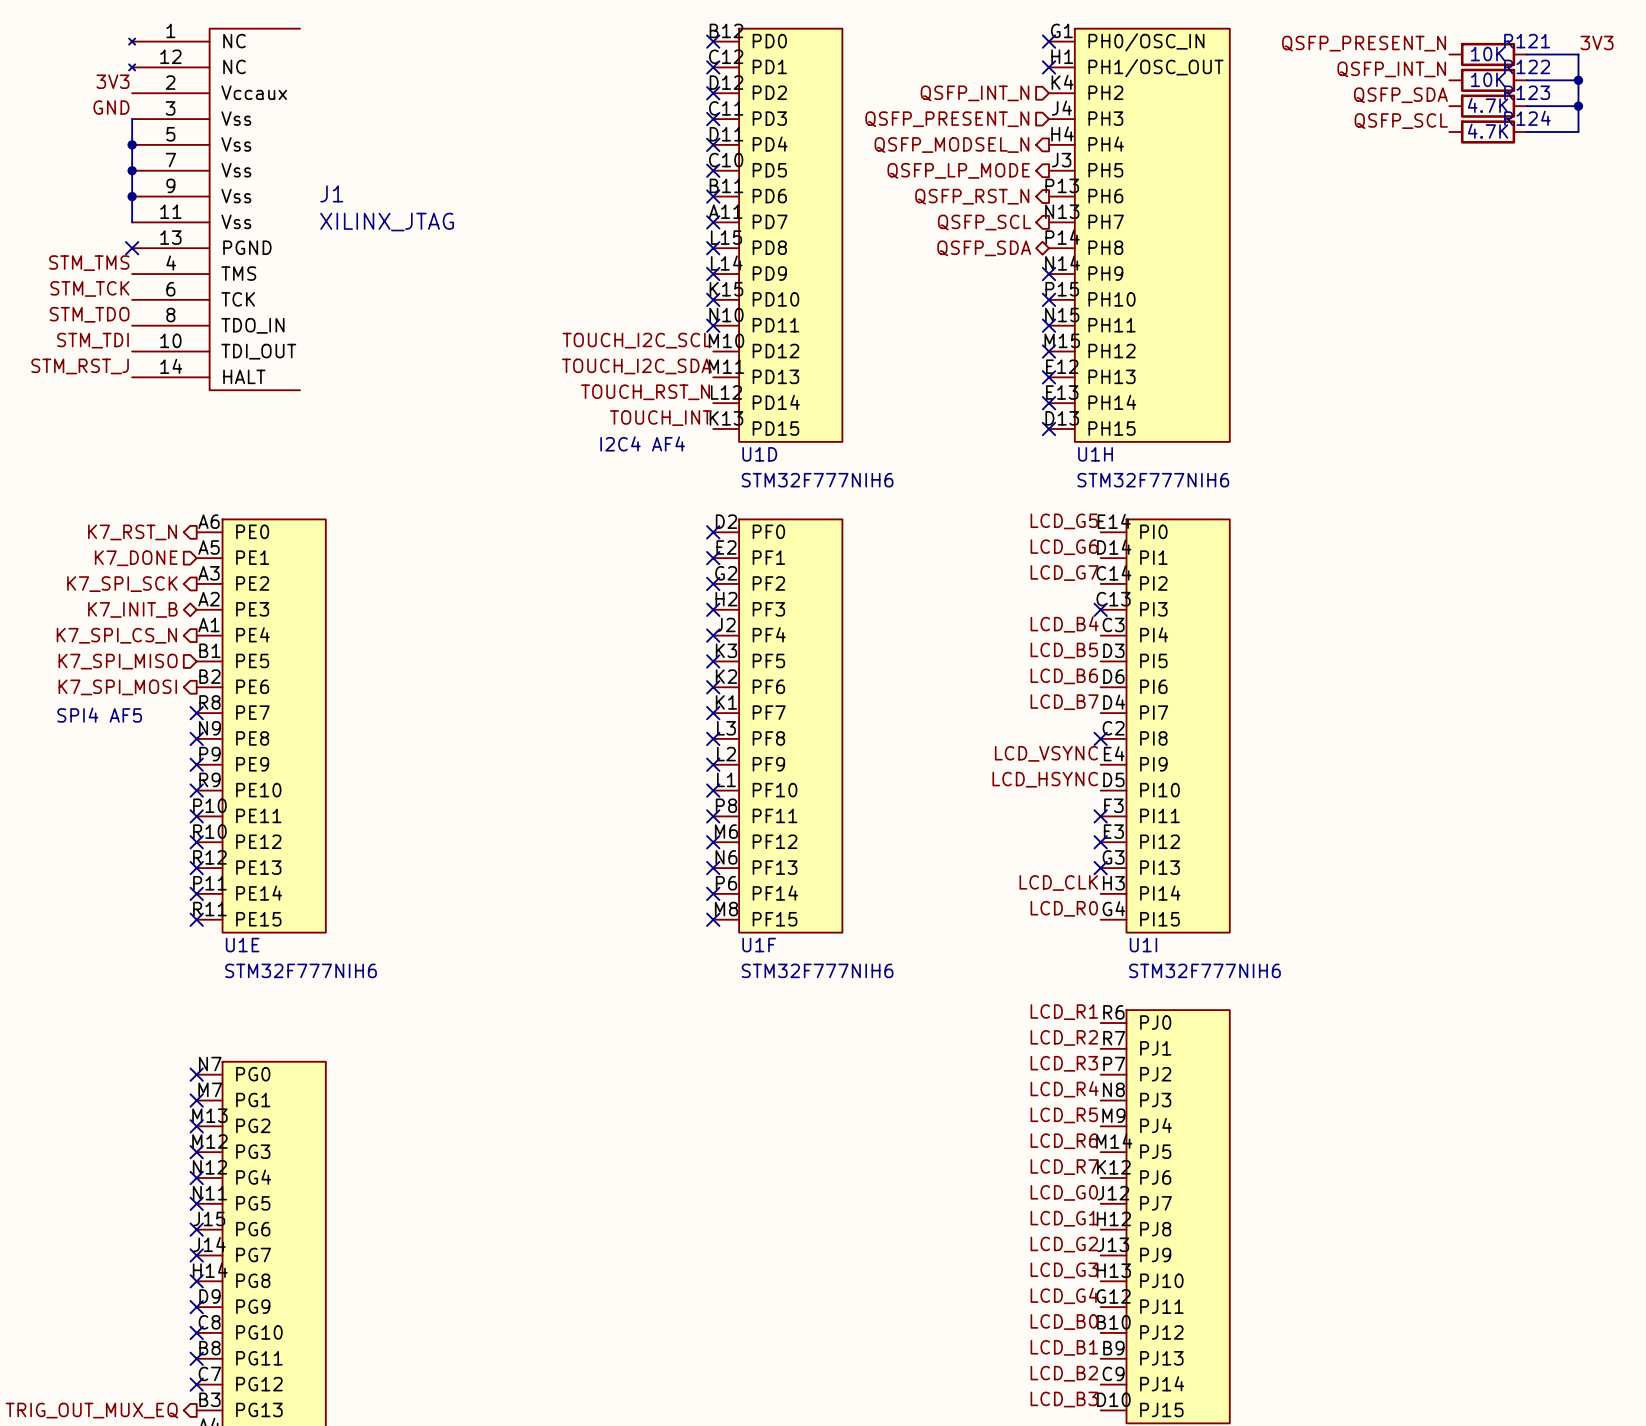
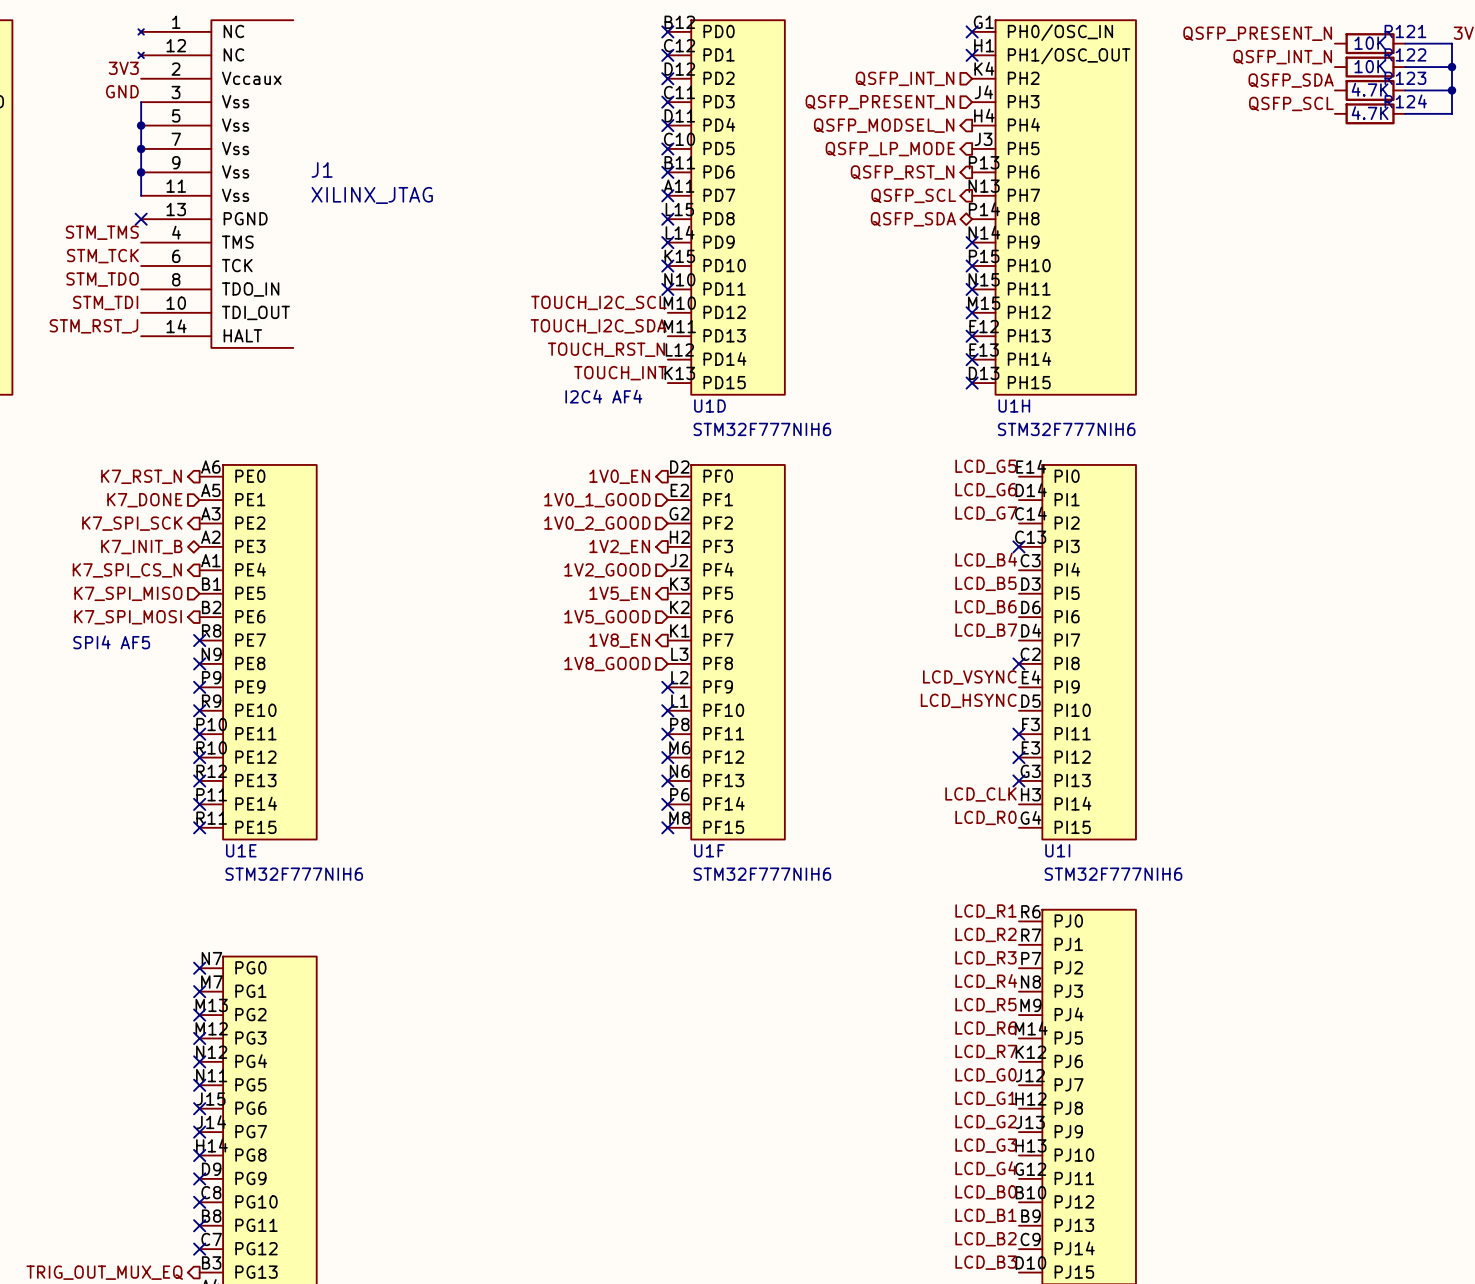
hierarchical label: none -> 1V0_EN (619, 476)
no-connect mark: (713, 532) -> none
hierarchical label: none -> 1V0_1_GOOD (597, 500)
no-connect mark: (713, 558) -> none
no-connect mark: (713, 583) -> none
hierarchical label: none -> 1V0_2_GOOD (597, 523)
hierarchical label: none -> 1V2_EN (619, 547)
no-connect mark: (713, 609) -> none
hierarchical label: none -> 1V2_GOOD (607, 570)
no-connect mark: (713, 635) -> none
hierarchical label: none -> 1V5_EN (619, 593)
no-connect mark: (713, 661) -> none
hierarchical label: none -> 1V5_GOOD (607, 617)
no-connect mark: (713, 687) -> none
hierarchical label: none -> 1V8_EN (619, 640)
no-connect mark: (713, 713) -> none
no-connect mark: (713, 738) -> none
hierarchical label: none -> 1V8_GOOD (607, 664)

